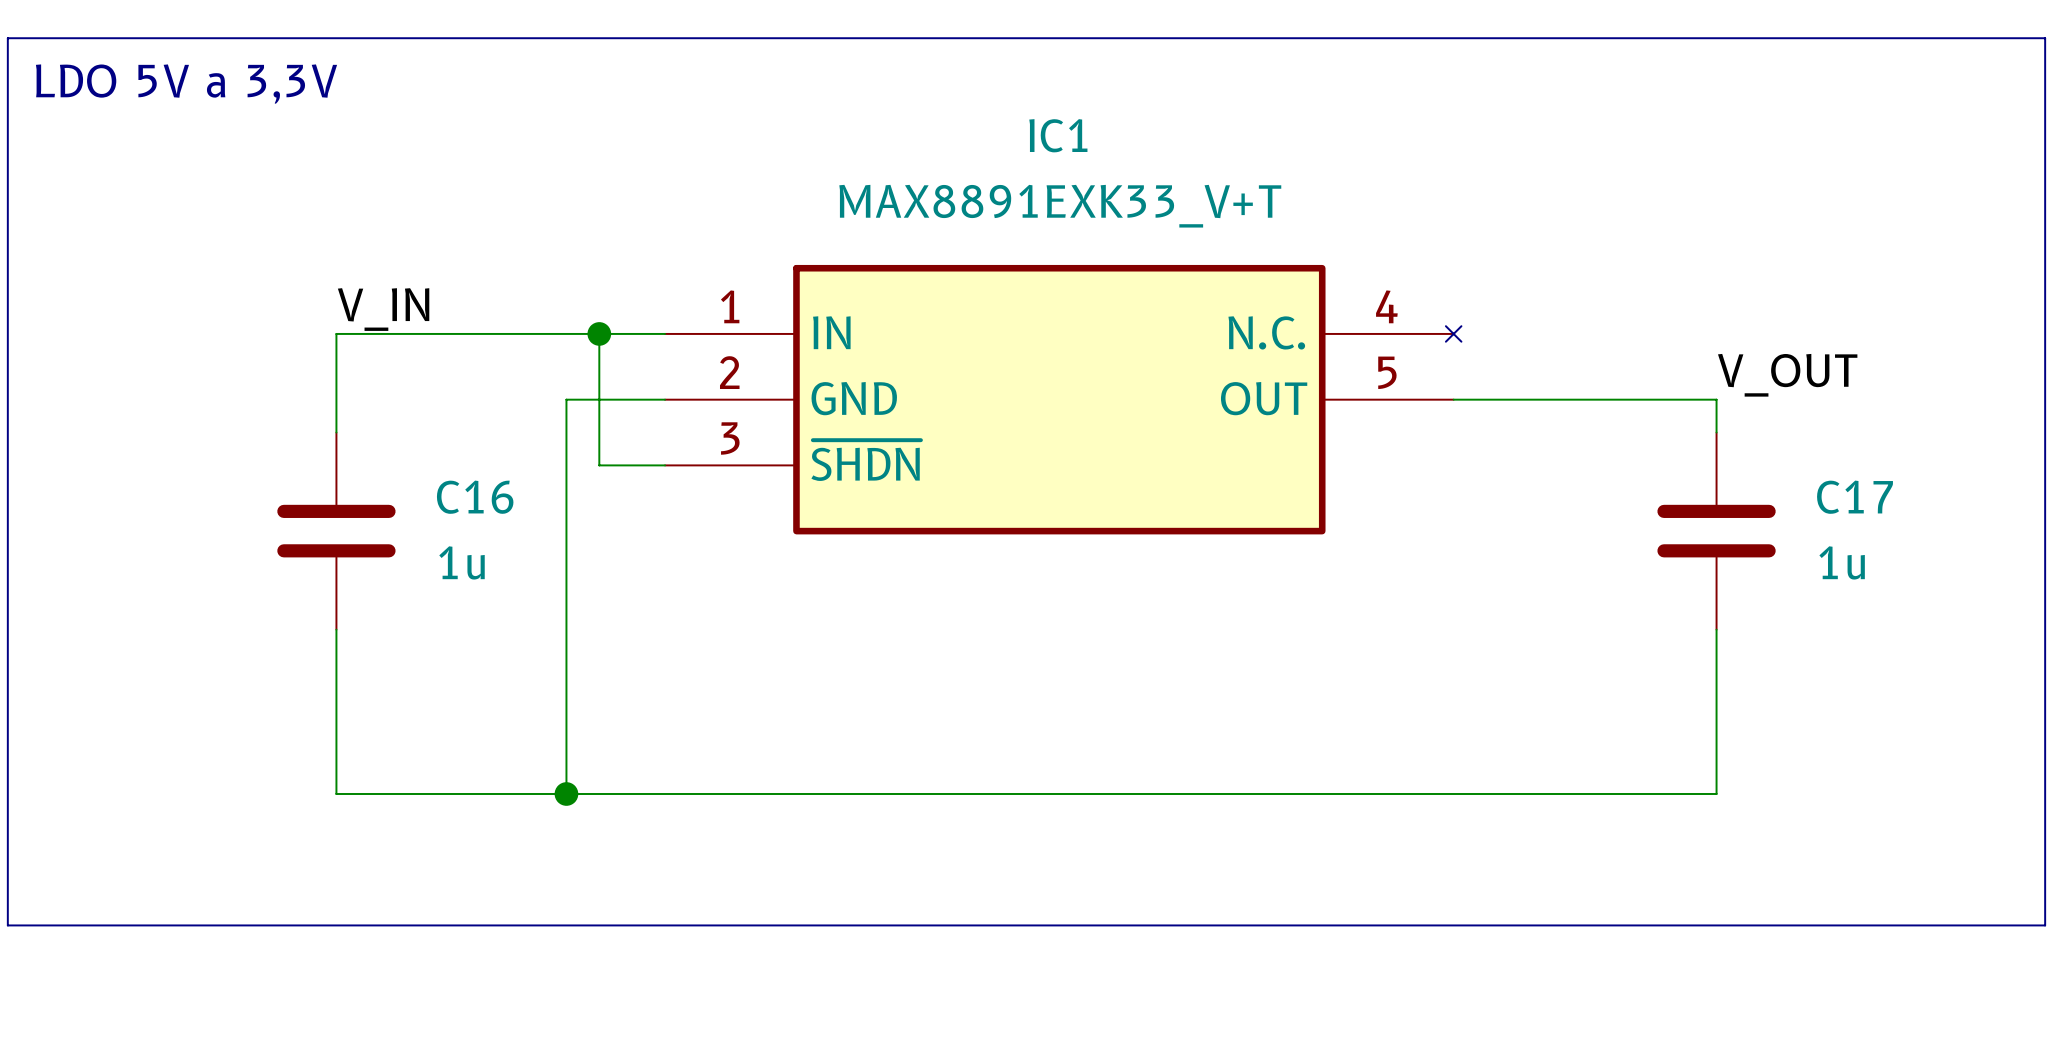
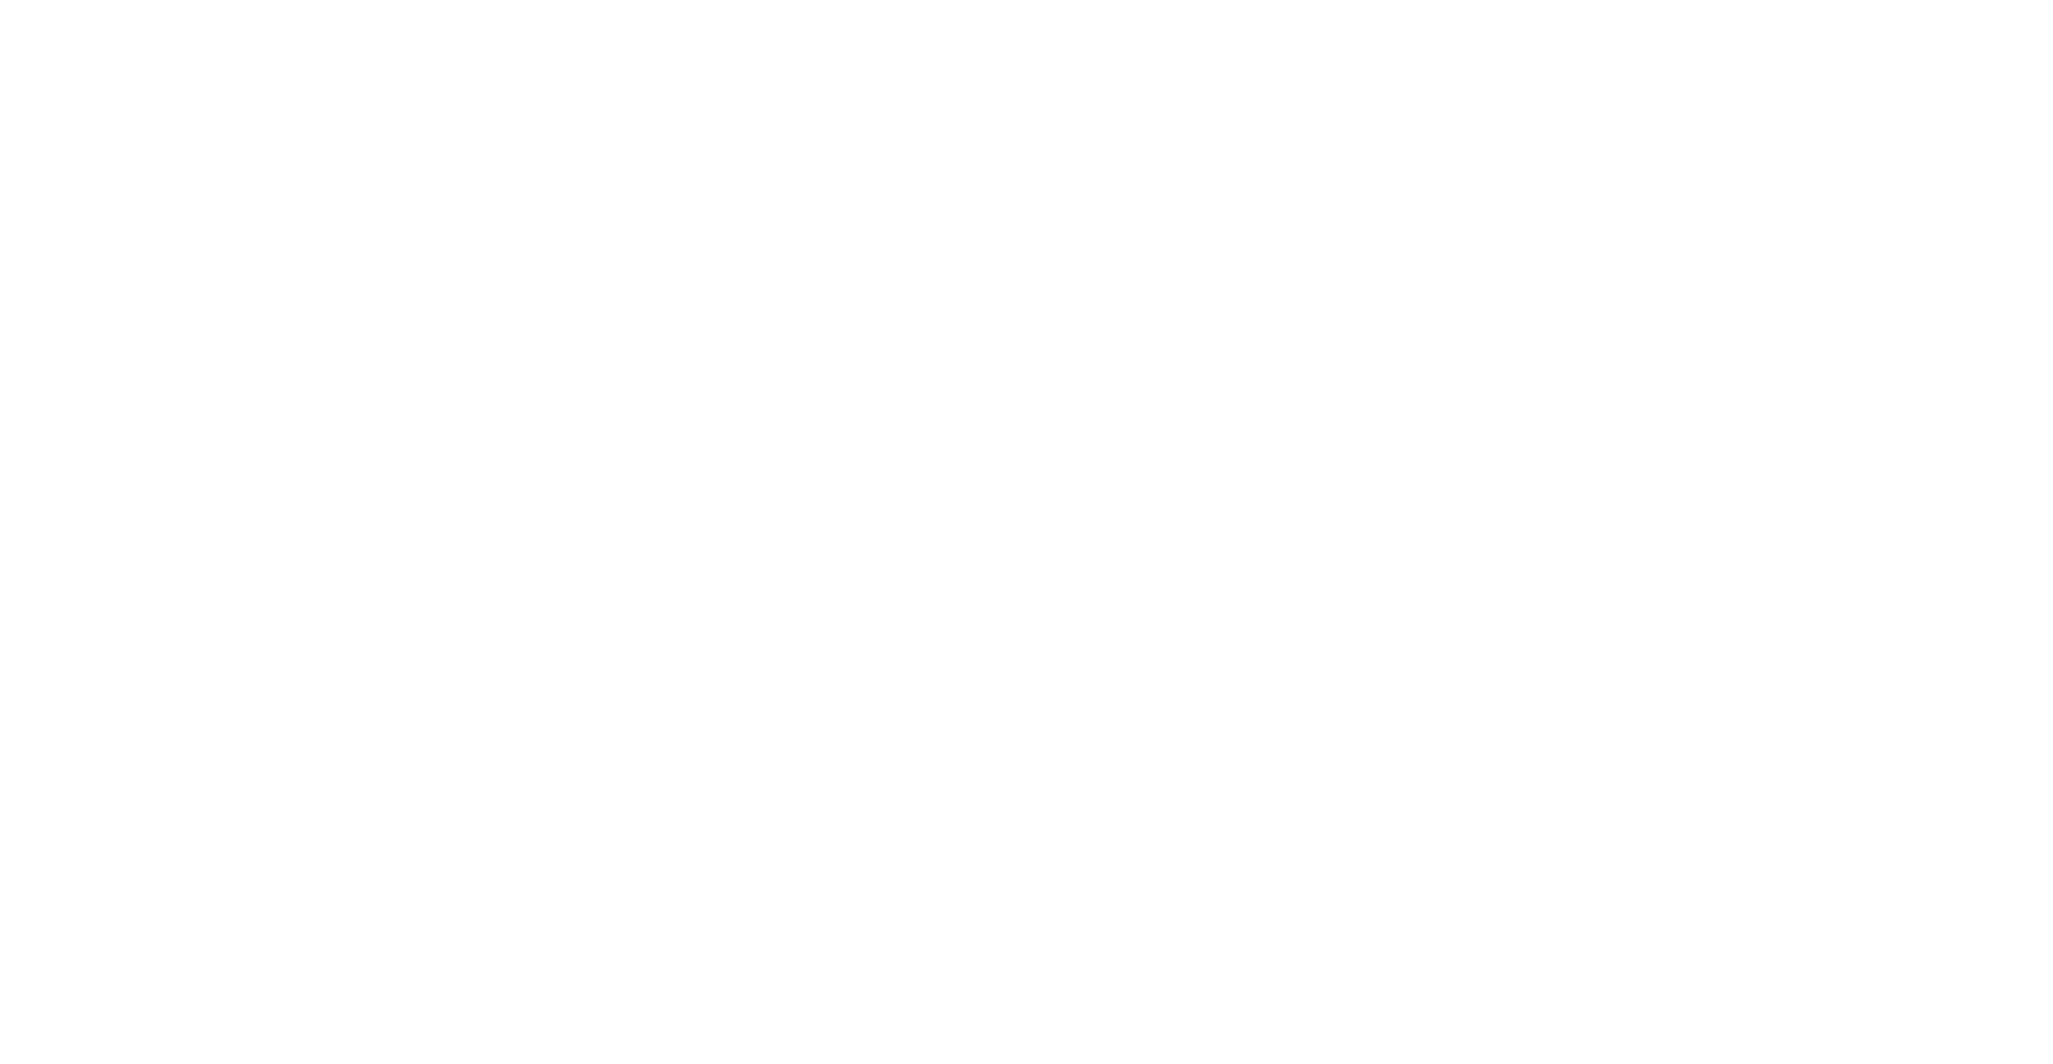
line: (7, 38) (2045, 38) (2045, 925) (7, 925) (7, 38) -> none
text: LDO 5V a 3,3V (186, 84) -> none
label: V_IN (383, 309) -> none
wire: (599, 333) (599, 465) (665, 465) -> none
junction: (599, 333) -> none
wire: (665, 333) (336, 333) (336, 432) -> none
label: V_OUT (1787, 375) -> none
wire: (665, 399) (566, 399) (566, 793) -> none
IC1: MAX8891EXK33_V+T (1063, 399) -> none
wire: (1453, 399) (1716, 399) (1716, 432) -> none
C16: 1u (336, 531) -> none
C17: 1u (1716, 531) -> none
wire: (336, 629) (336, 793) (1716, 793) (1716, 629) -> none
junction: (566, 793) -> none

